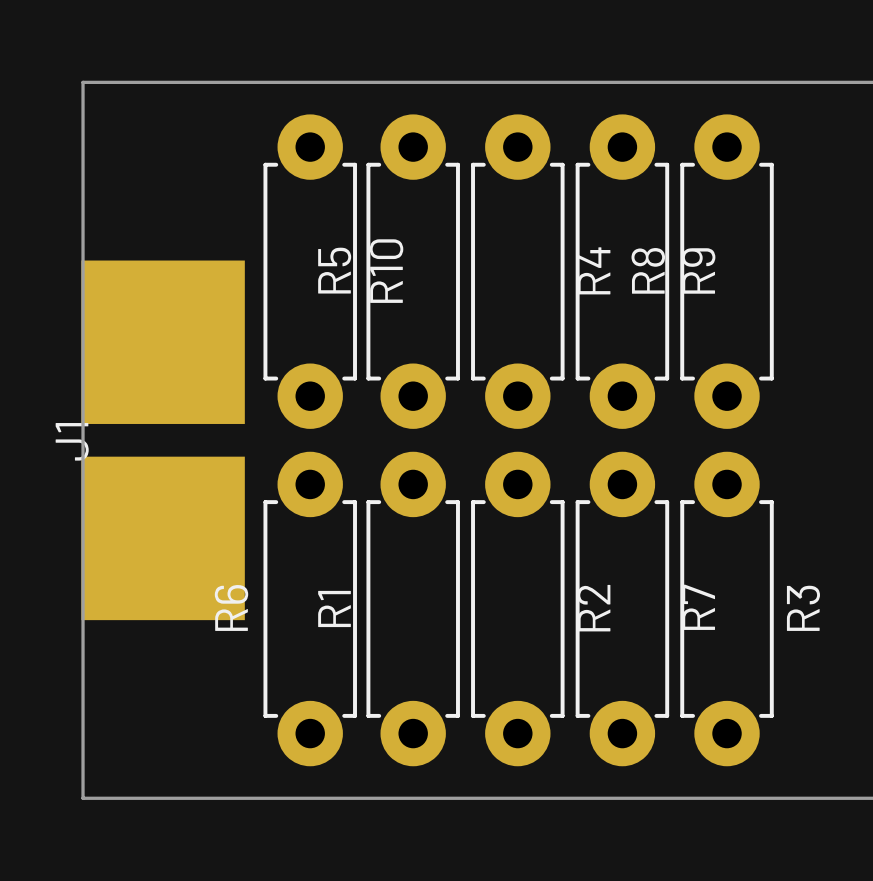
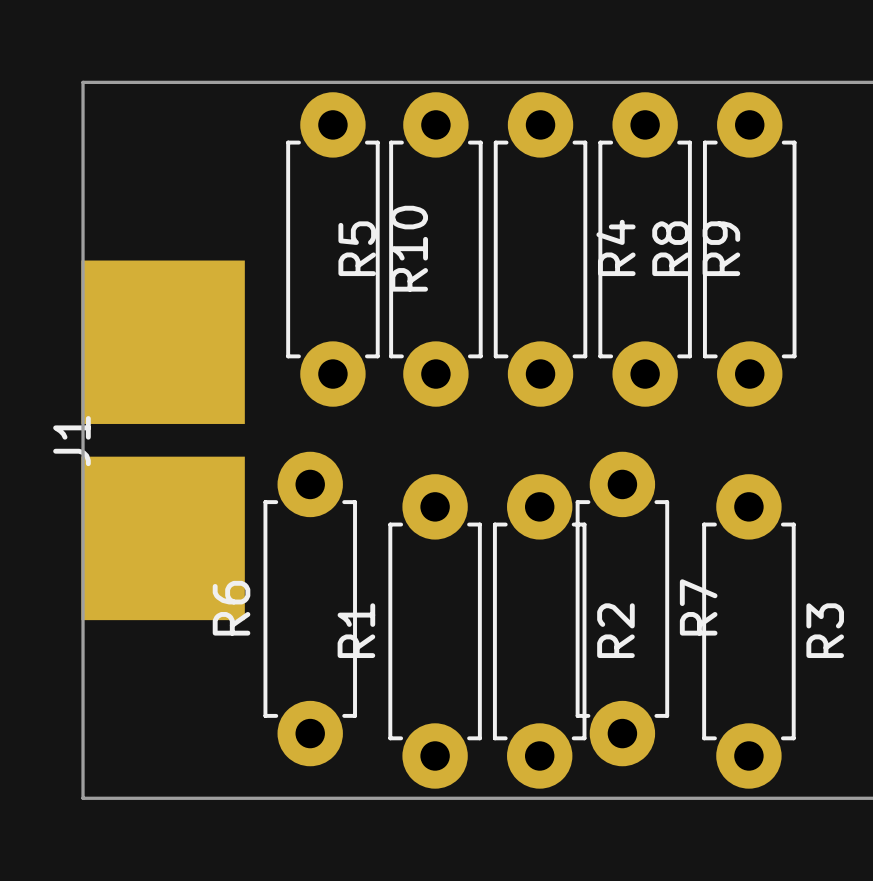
R10 position: (310, 271) -> (332, 249)
R5 position: (413, 271) -> (435, 249)
R4 position: (517, 271) -> (540, 249)
R9 position: (622, 271) -> (645, 249)
R8 position: (727, 271) -> (749, 249)
R1 position: (413, 609) -> (435, 631)
R2 position: (517, 609) -> (539, 631)
R3 position: (727, 609) -> (748, 631)

